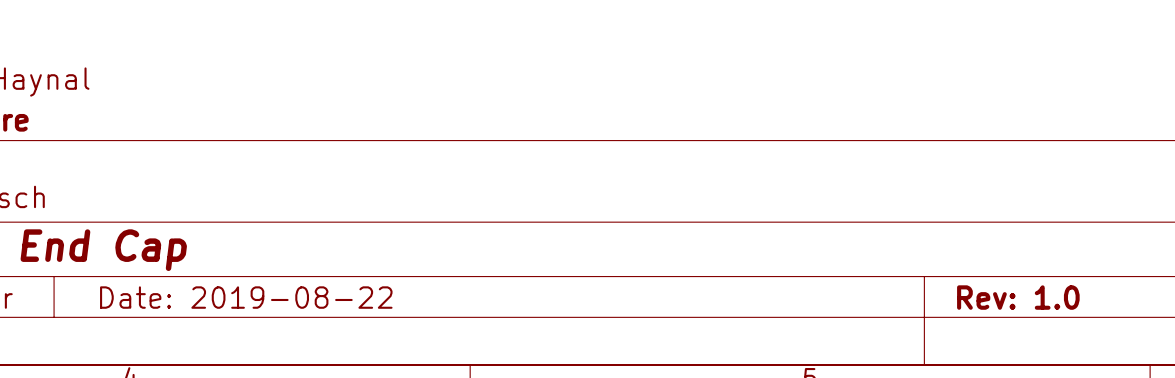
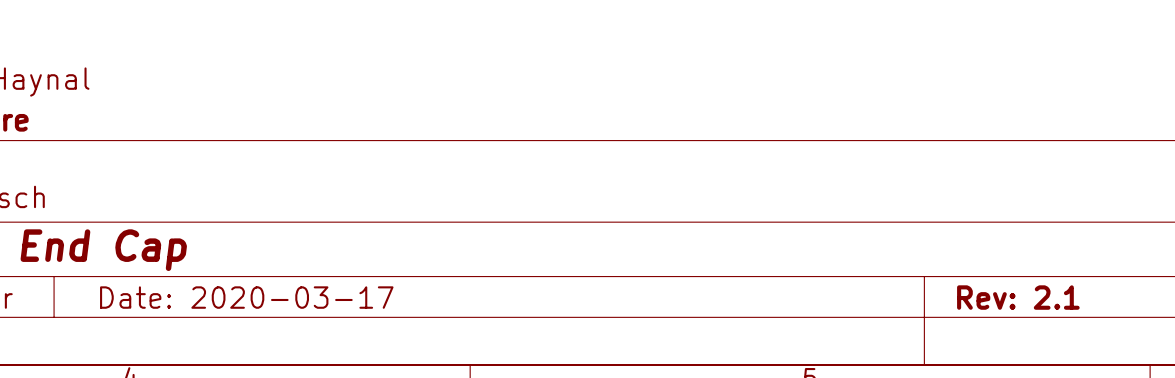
title block: Date: 2019-08-22 (246, 297) -> Date: 2020-03-17 (246, 297)
title block: Rev: 1.0 (1018, 297) -> Rev: 2.1 (1018, 297)

